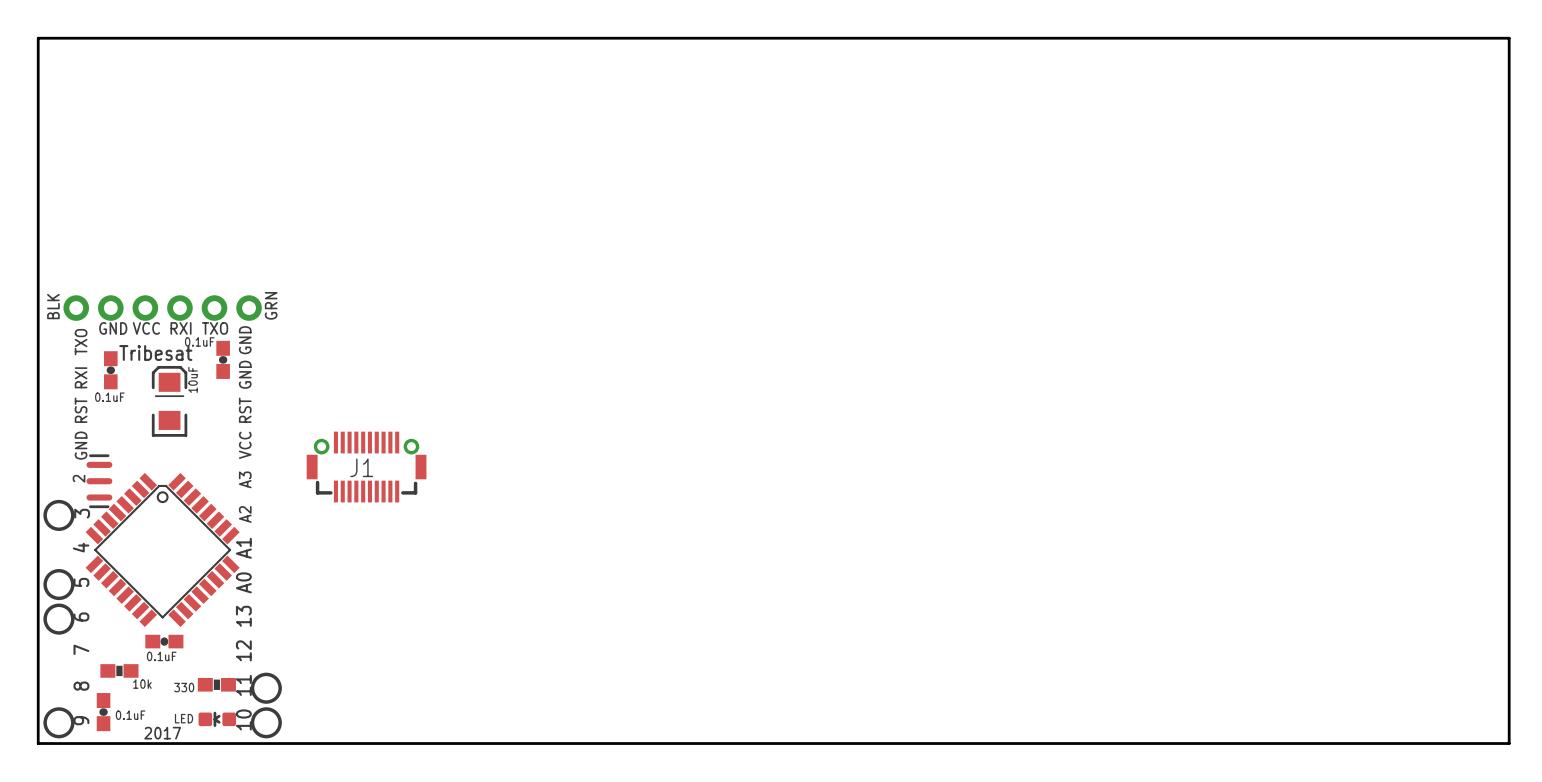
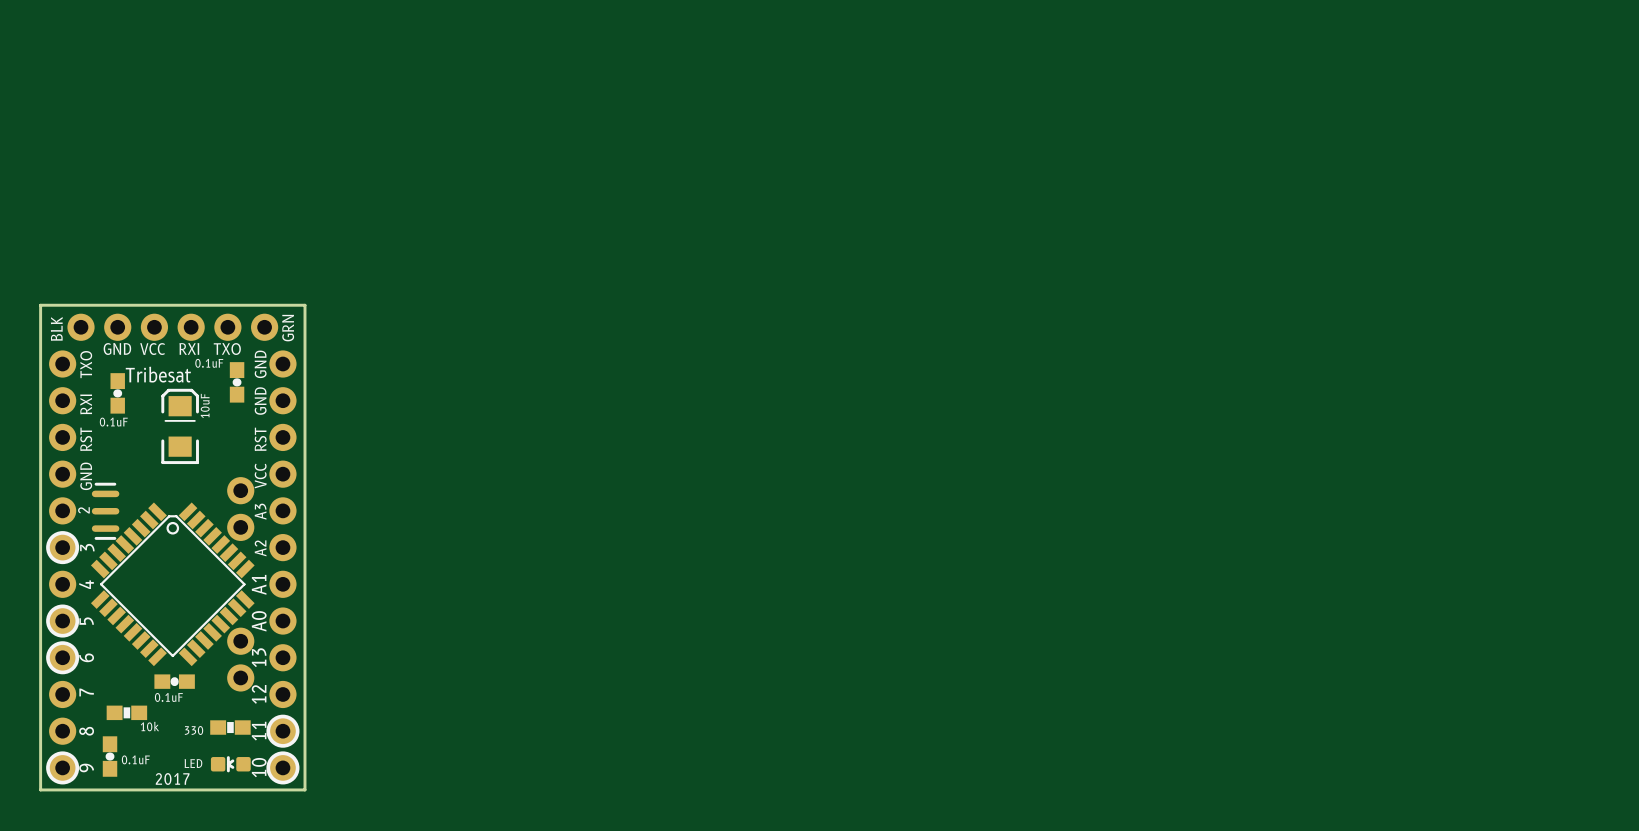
board edge: (38, 287) (38, 38) (1509, 38) (1509, 743) (287, 743) -> (40, 305) (304, 305) (304, 789)
J1: (366, 467) -> none
part: none -> (240, 509)
part: none -> (62, 565)
part: none -> (282, 565)
part: none -> (240, 659)

